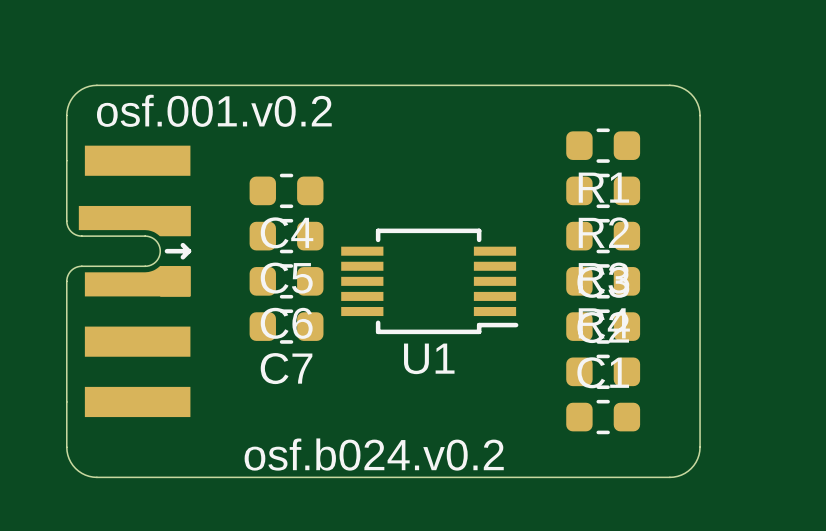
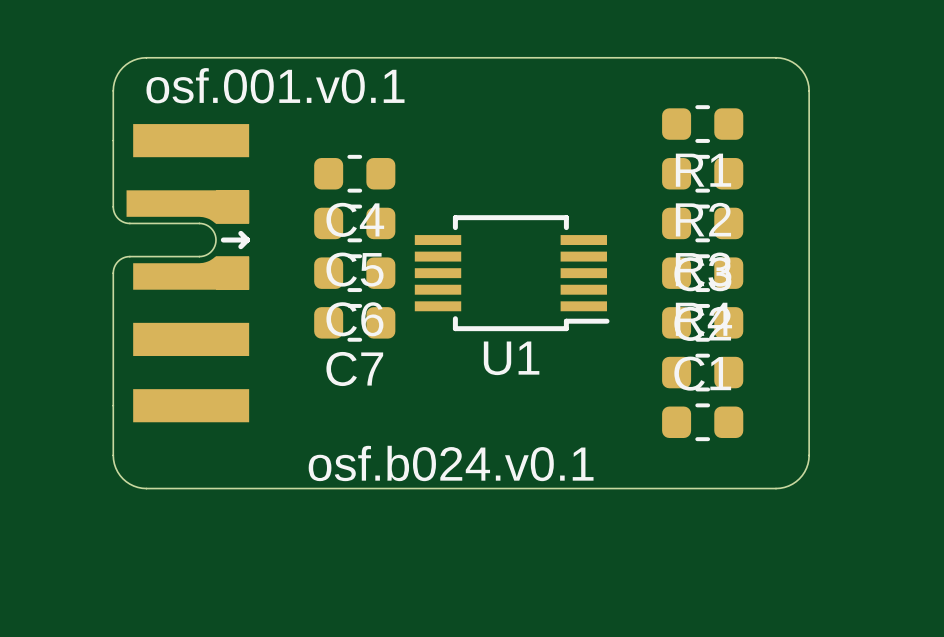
text: osf.001.v0.2 (214, 110) -> osf.001.v0.1 (275, 85)
text: osf.b024.v0.2 (374, 454) -> osf.b024.v0.1 (451, 463)

